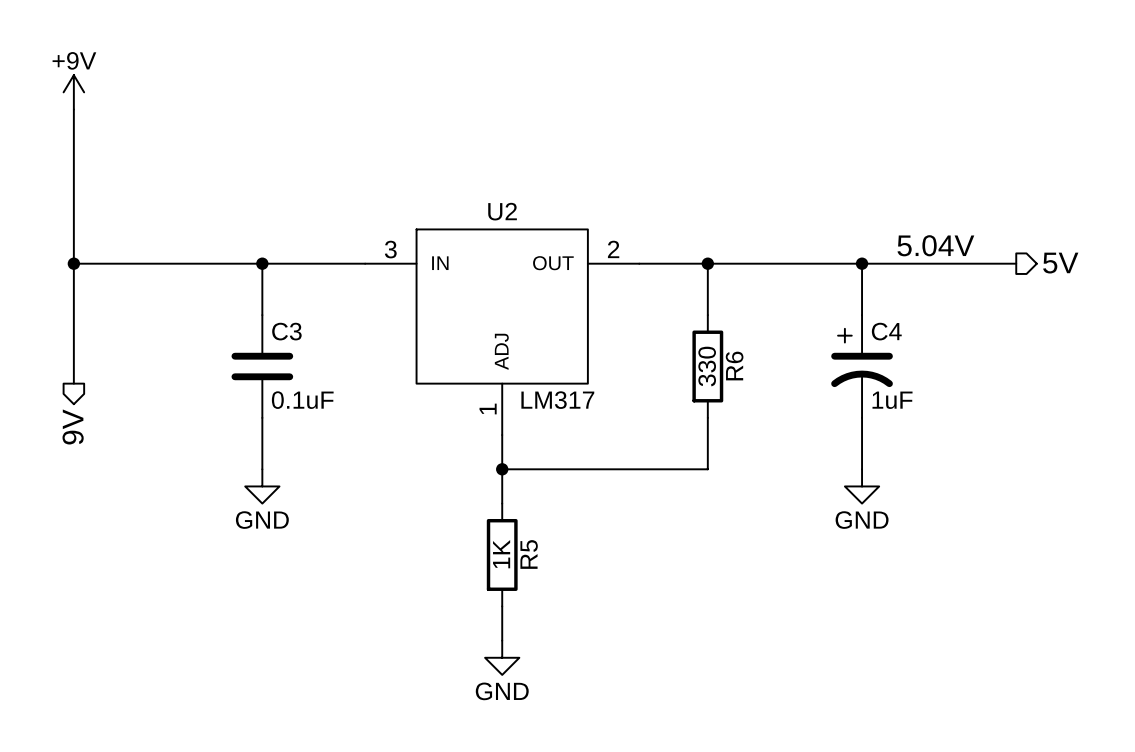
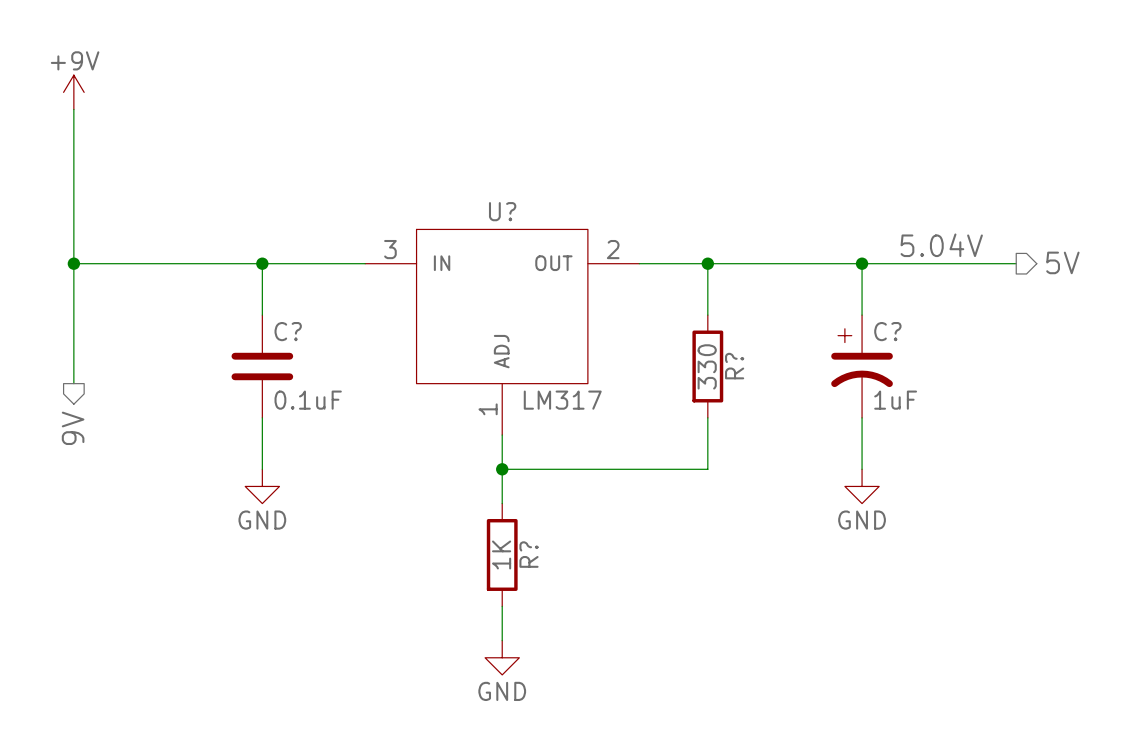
U2 name: U2 (502, 211) -> U? (502, 211)
C3 name: C3 (286, 331) -> C? (288, 331)
C4 name: C4 (886, 331) -> C? (887, 331)
R6 name: R6 (734, 366) -> R? (734, 366)
R5 name: R5 (529, 554) -> R? (528, 554)

